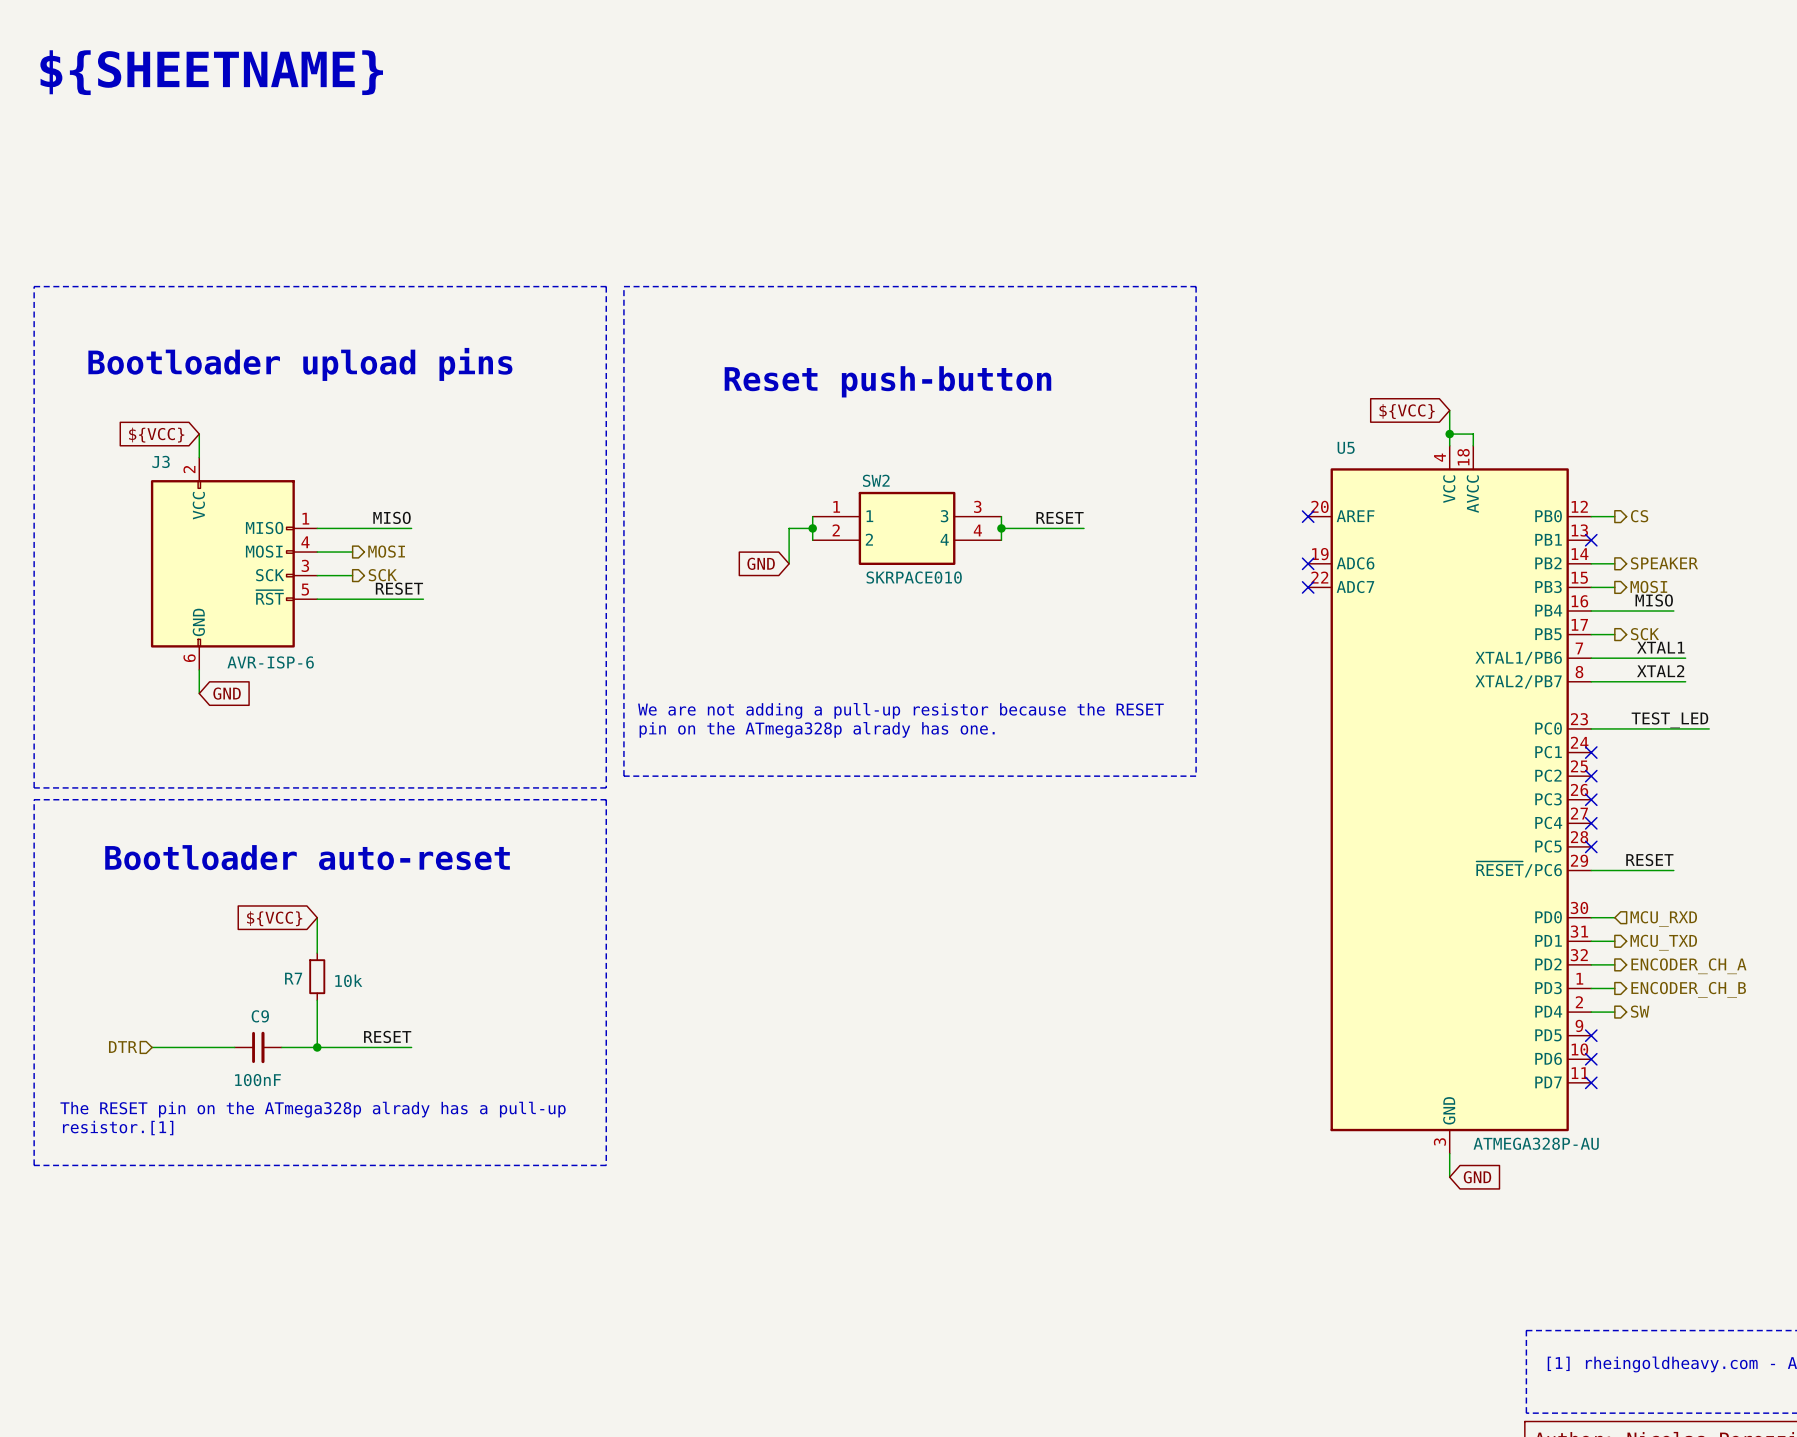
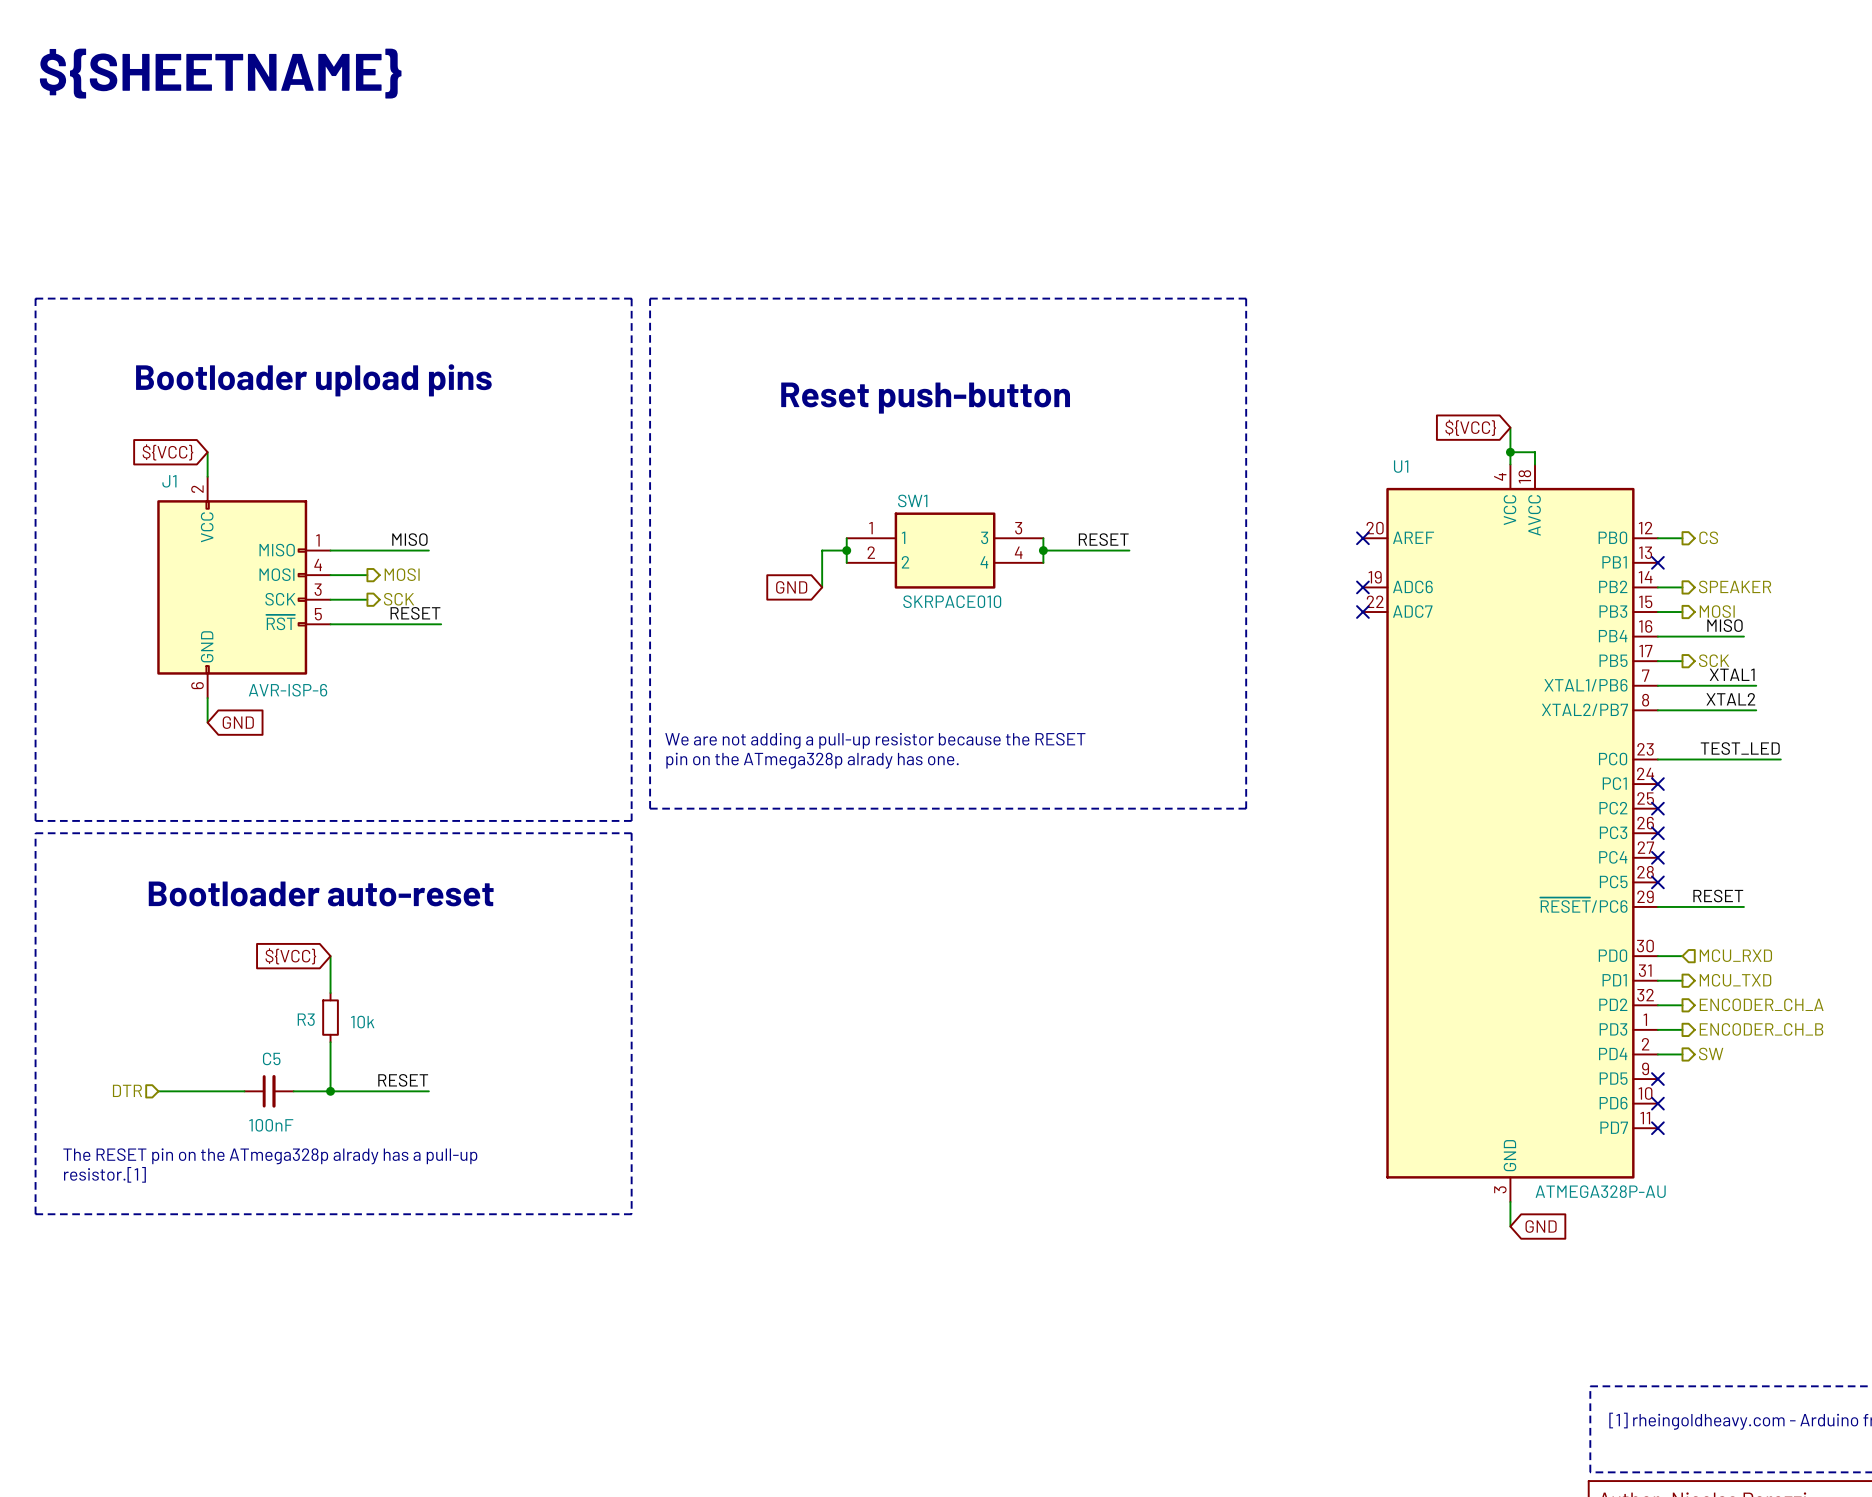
U5 name: U5 (1346, 447) -> U1 (1401, 466)
J3 name: J3 (161, 461) -> J1 (169, 481)
SW2 name: SW2 (876, 480) -> SW1 (912, 500)
R7 name: R7 (293, 978) -> R3 (306, 1019)
C9 name: C9 (260, 1016) -> C5 (271, 1058)

